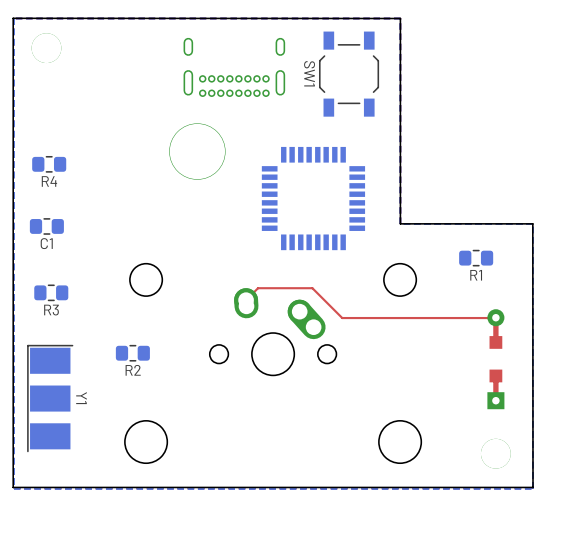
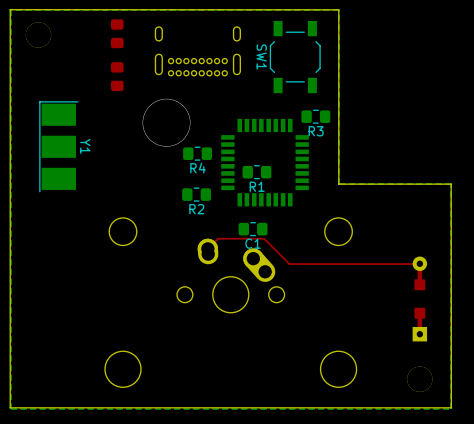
part: none -> (117, 33)
part: none -> (117, 76)
R4 position: (49, 164) -> (197, 153)
C1 position: (46, 226) -> (253, 229)
R1 position: (476, 258) -> (256, 172)
R3 position: (51, 292) -> (315, 116)
R2 position: (132, 353) -> (196, 194)
Y1 position: (50, 398) -> (58, 146)

